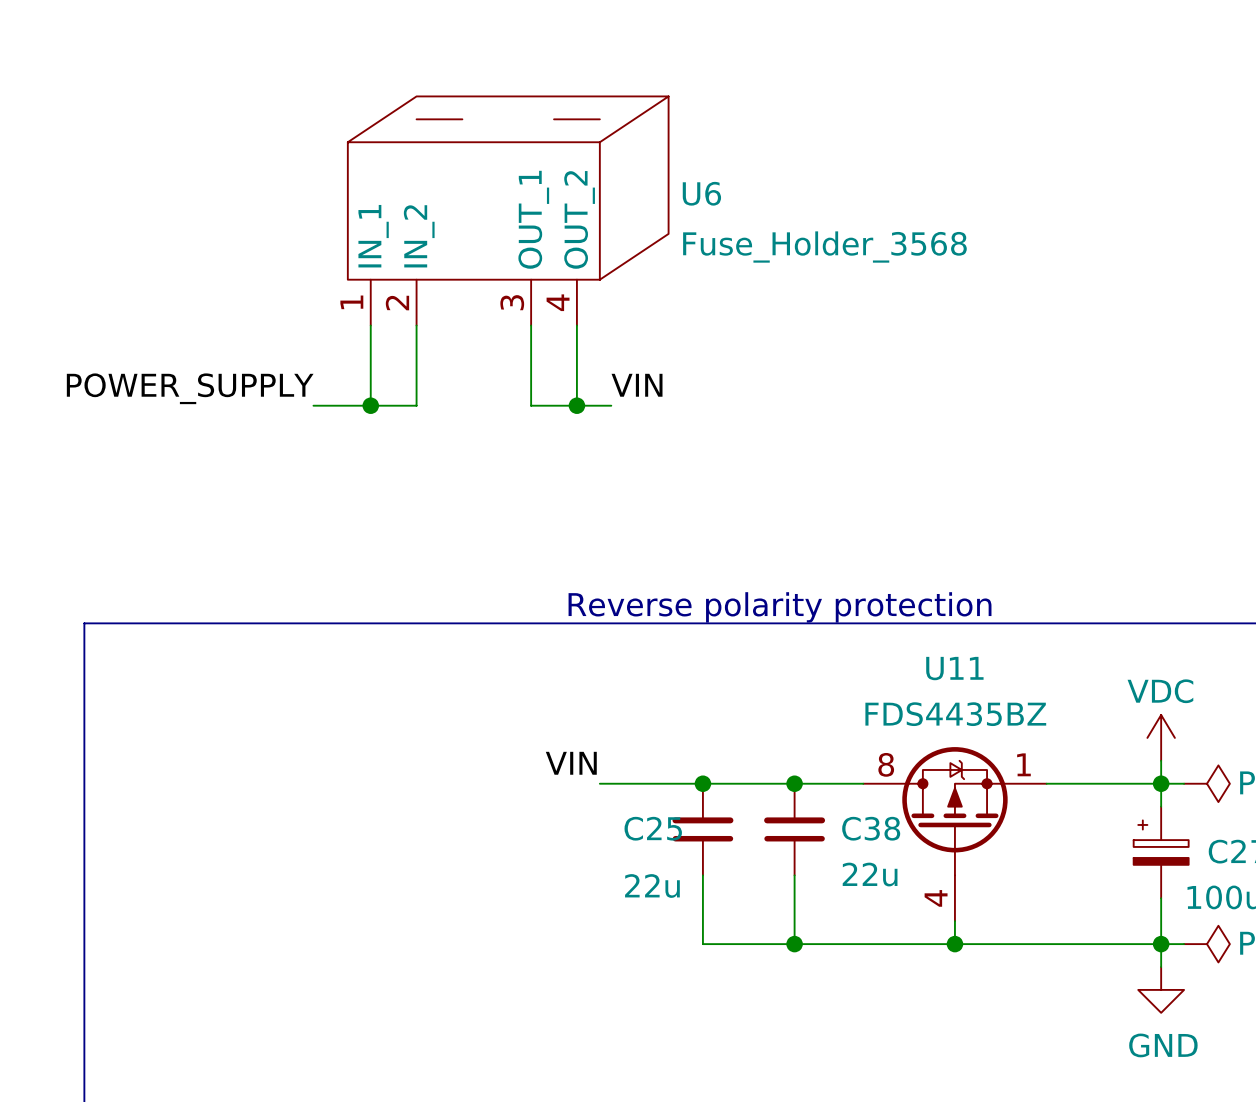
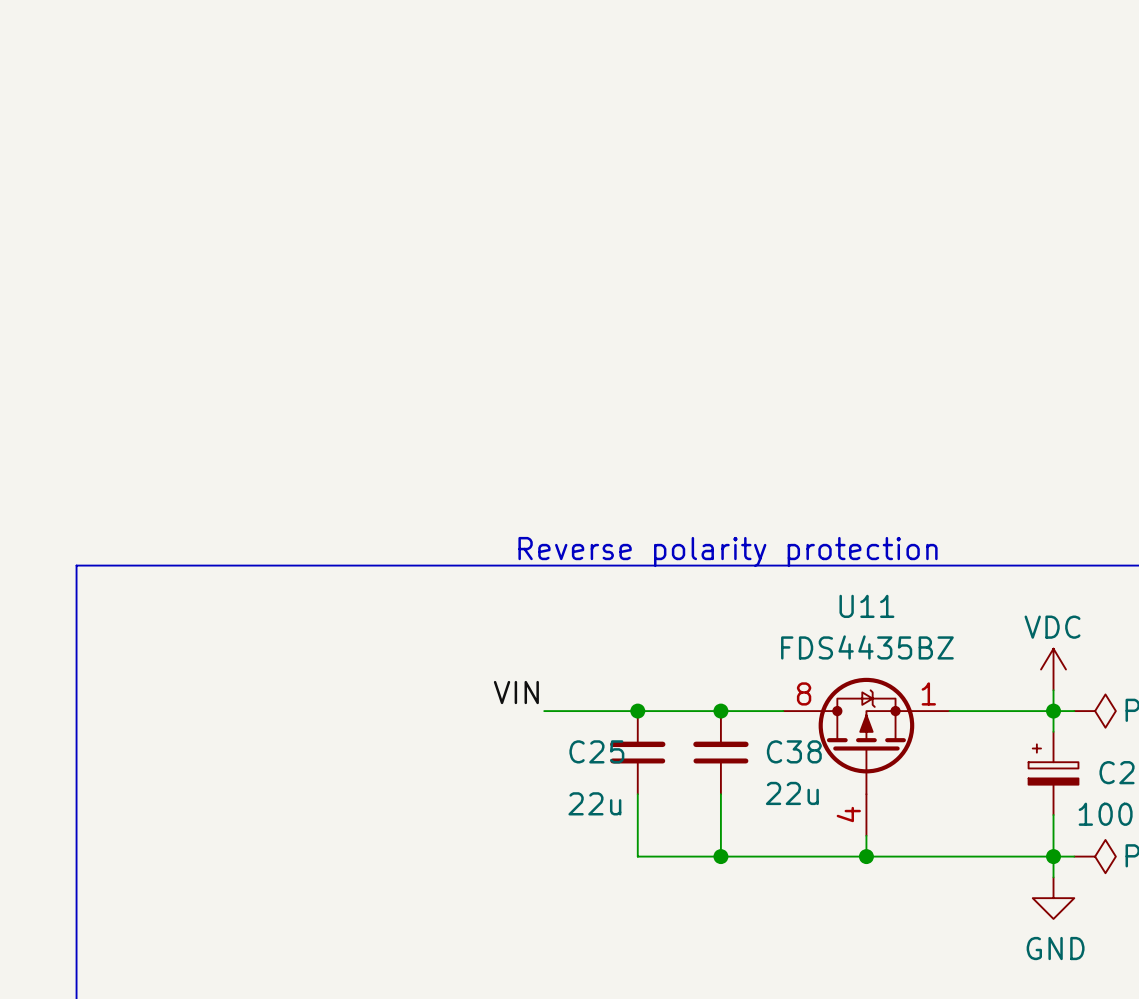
U6: Fuse_Holder_3568 (508, 210) -> none
wire: (370, 325) (370, 405) -> none
wire: (416, 325) (416, 405) (313, 405) -> none
wire: (531, 325) (531, 405) (611, 405) -> none
wire: (576, 325) (576, 405) -> none
label: VIN (637, 385) -> none
label: POWER_SUPPLY (190, 388) -> none
junction: (370, 405) -> none
junction: (576, 405) -> none

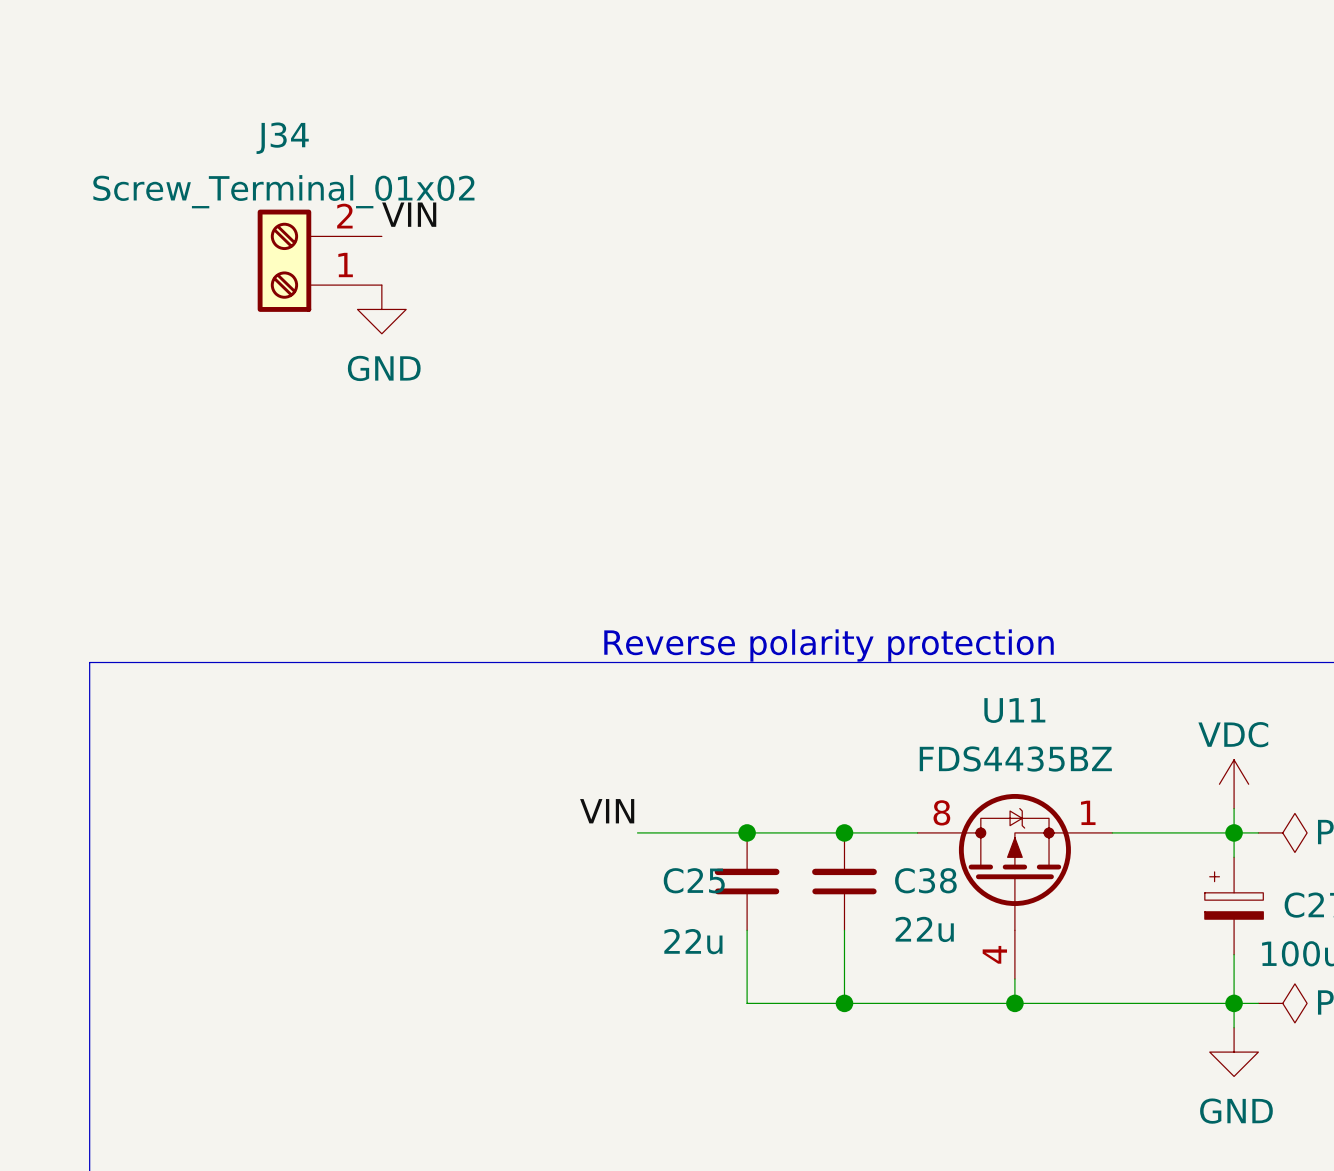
label: none -> VIN (409, 214)
J34: none -> Screw_Terminal_01x02 (319, 260)
power symbol: none -> GND (381, 309)

